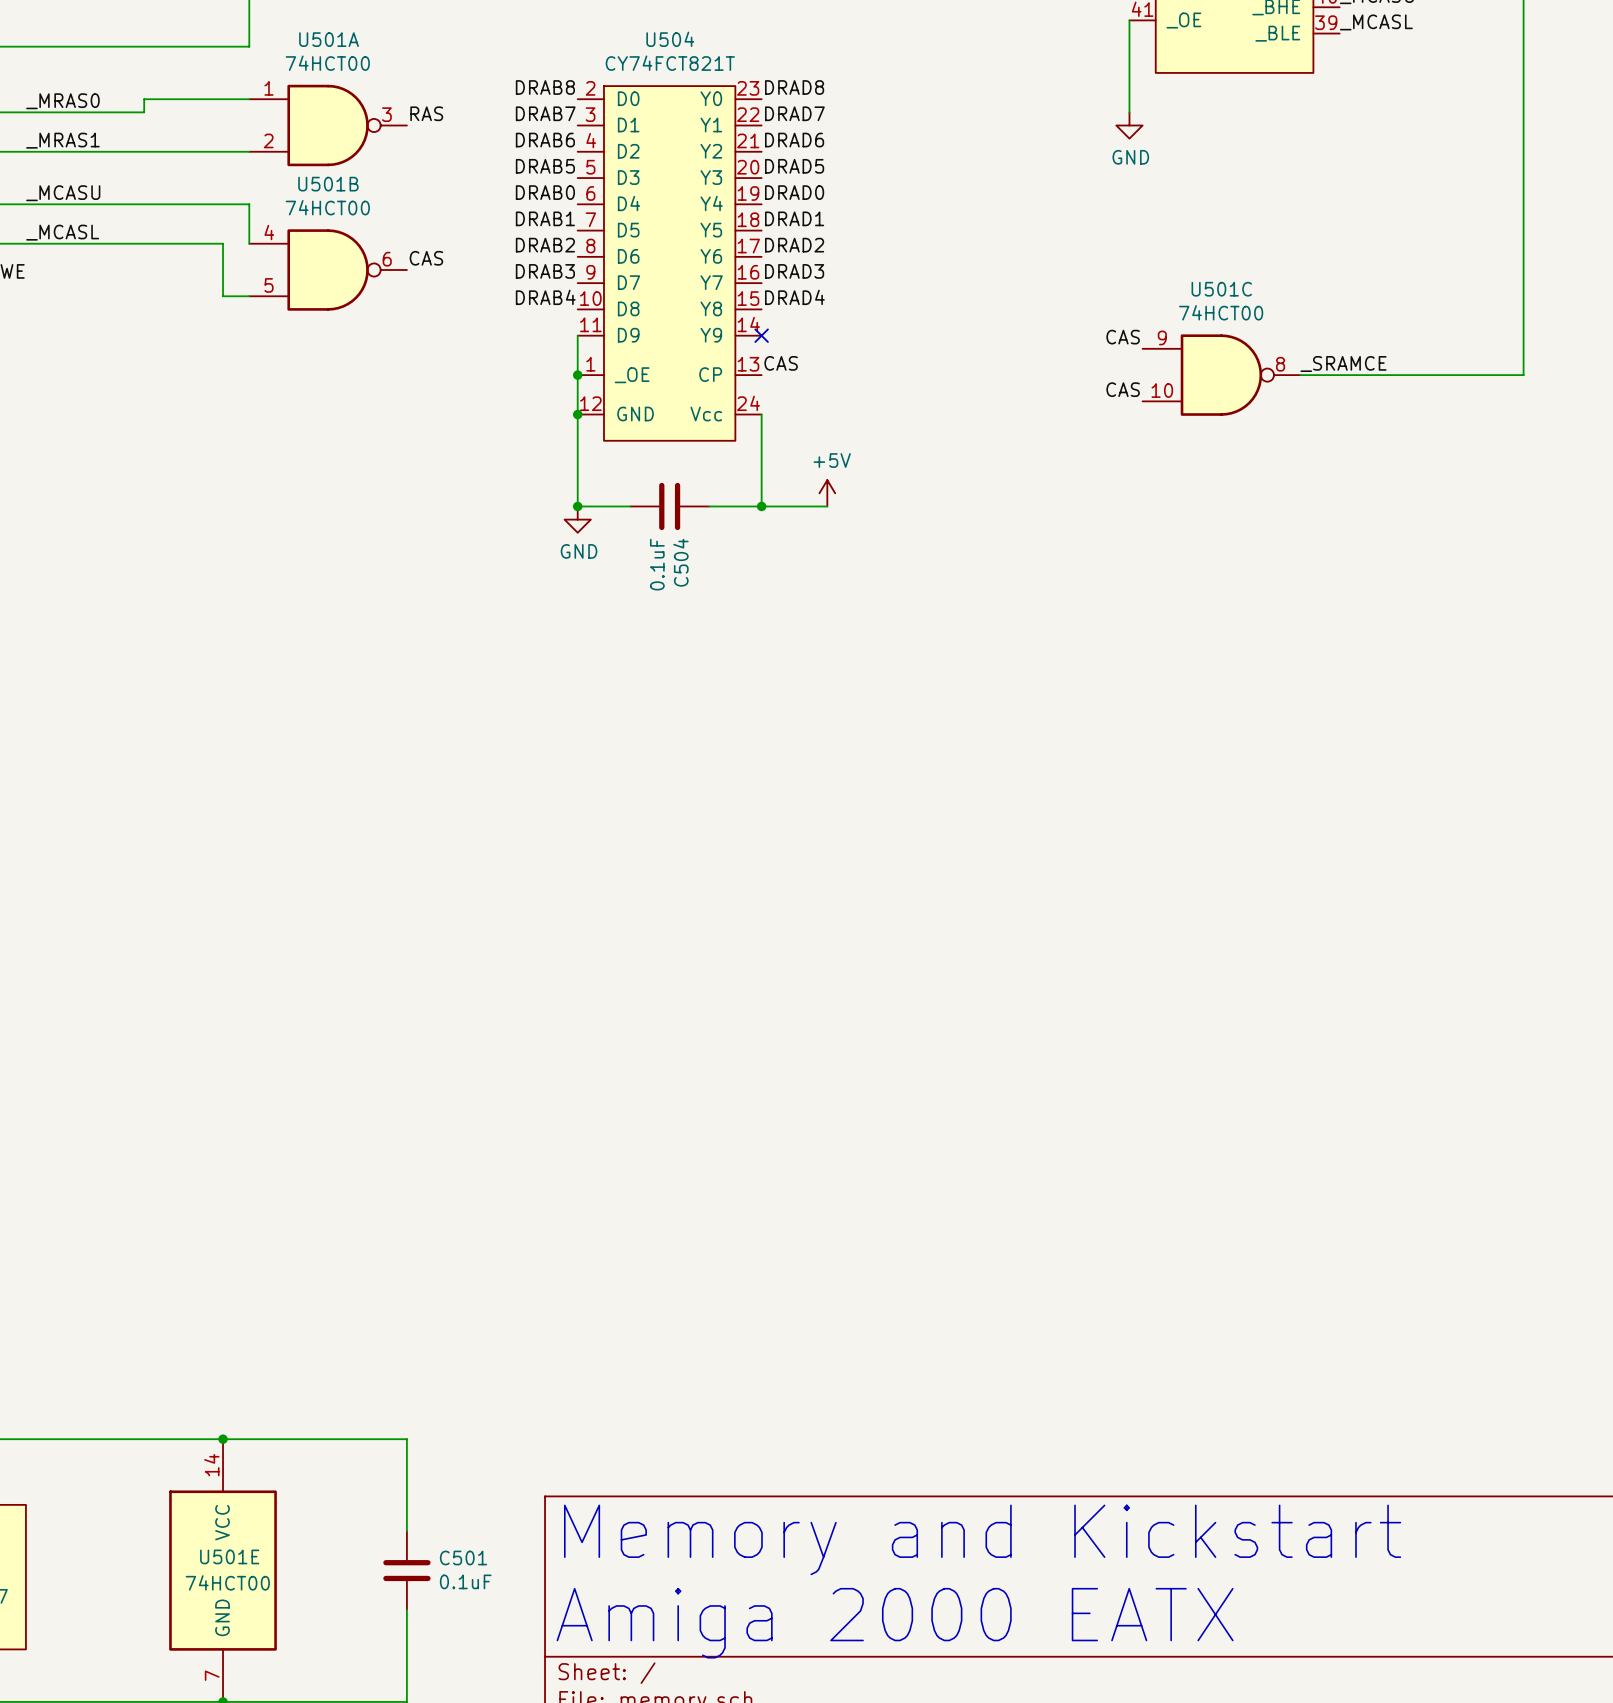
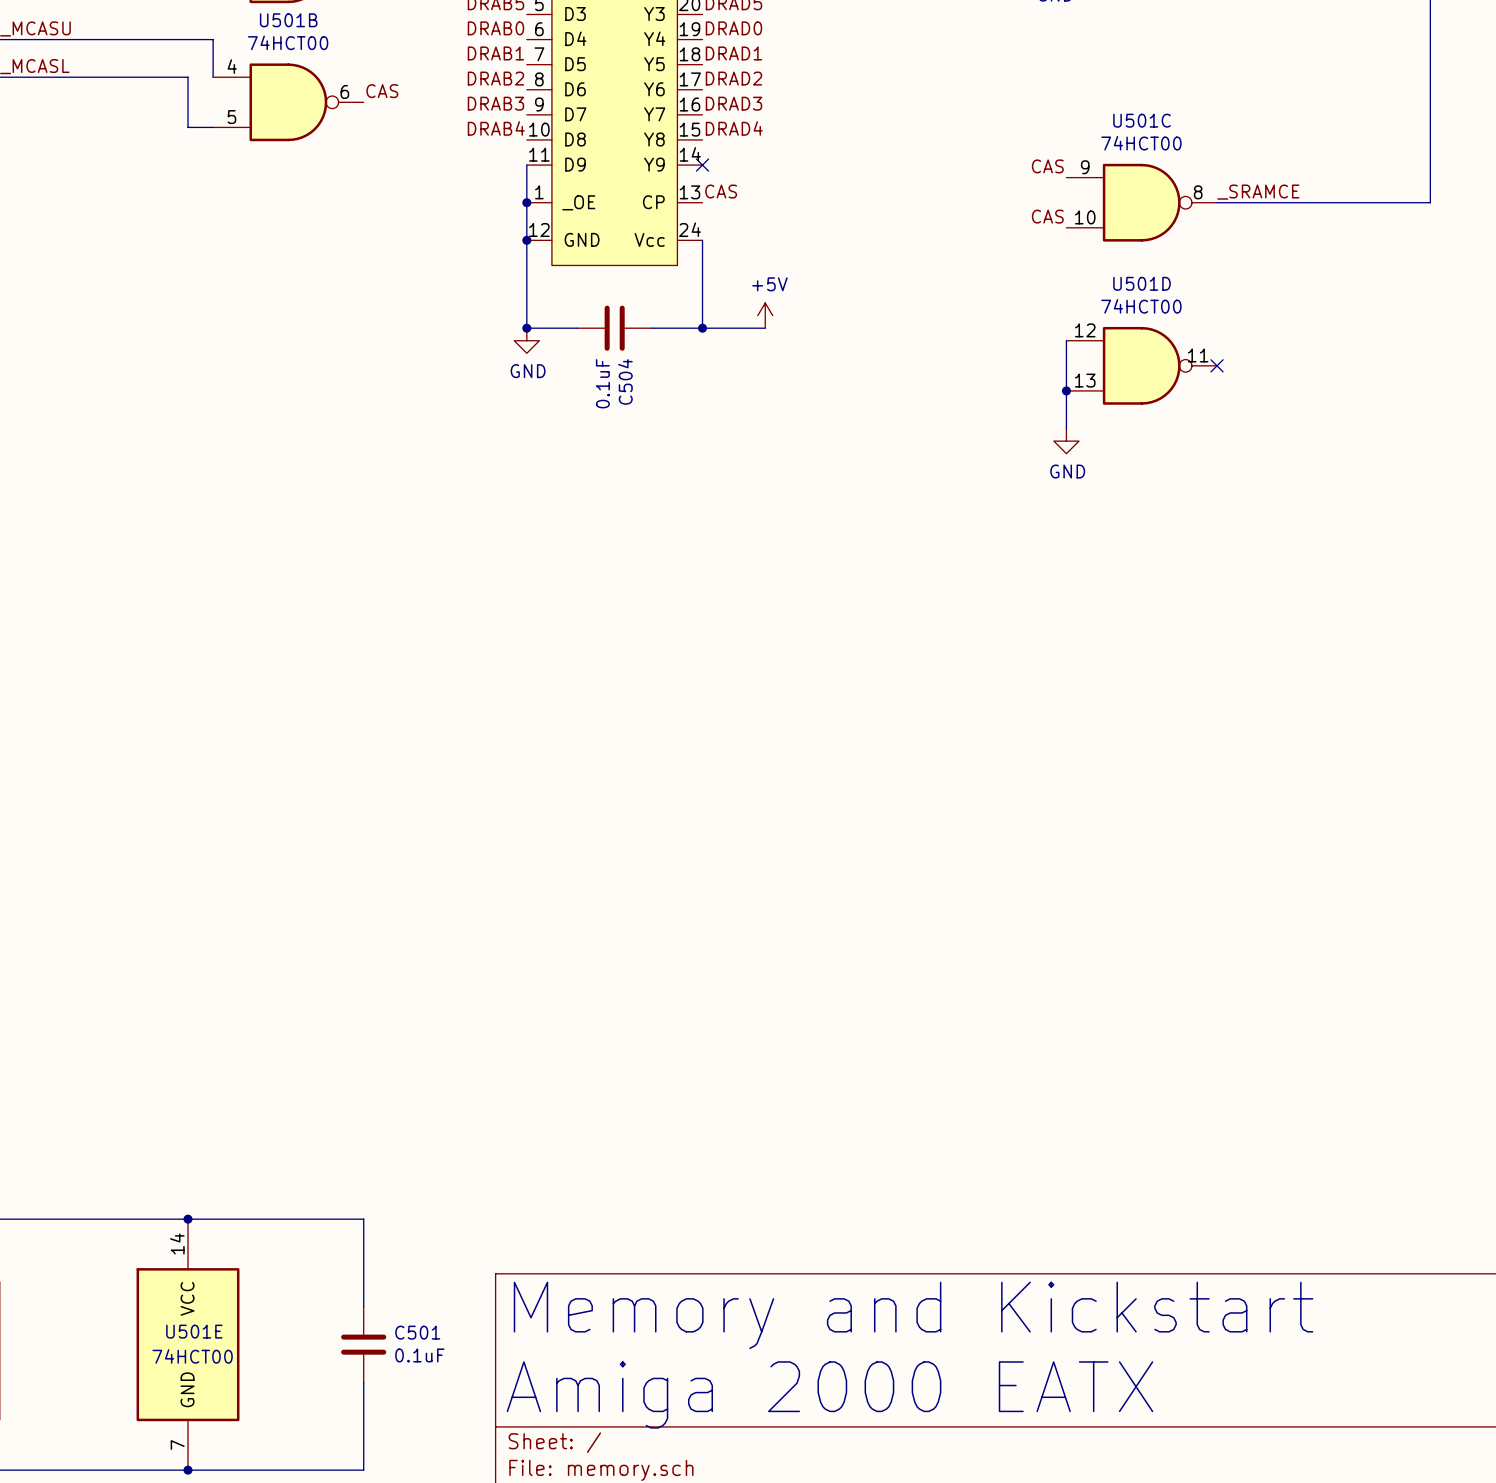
wire: none -> (1066, 340) (1066, 428)
U501D: none -> 74HCT00 (1141, 365)
no-connect mark: none -> (1217, 365)
junction: none -> (1066, 390)
power symbol: none -> GND (1066, 441)

